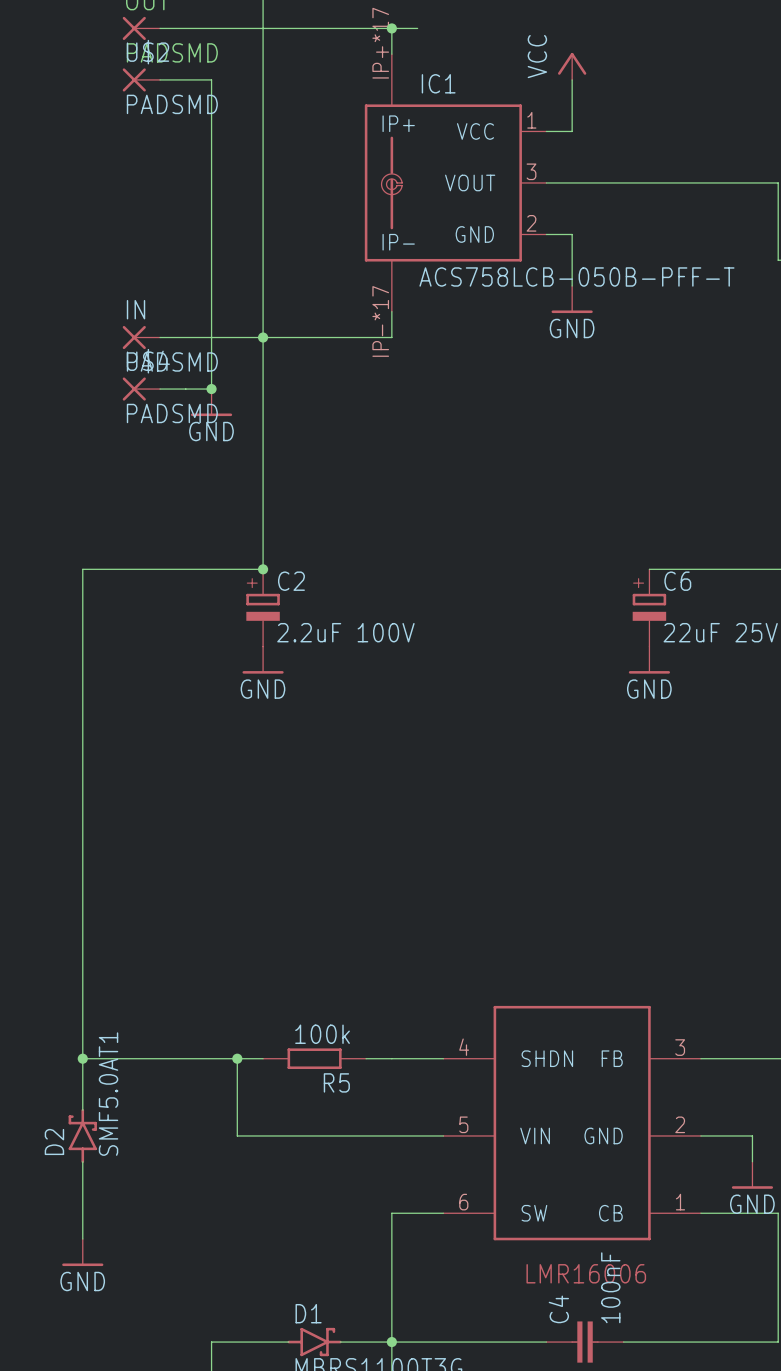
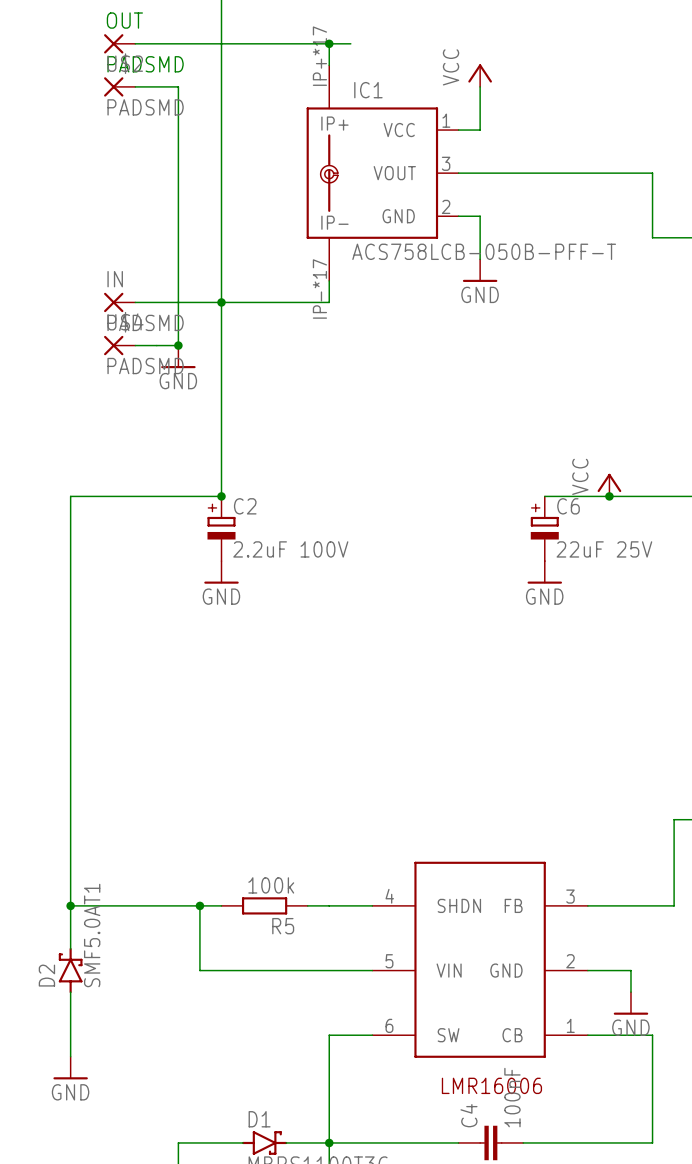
power symbol: none -> VCC (609, 485)
junction: none -> (609, 496)

